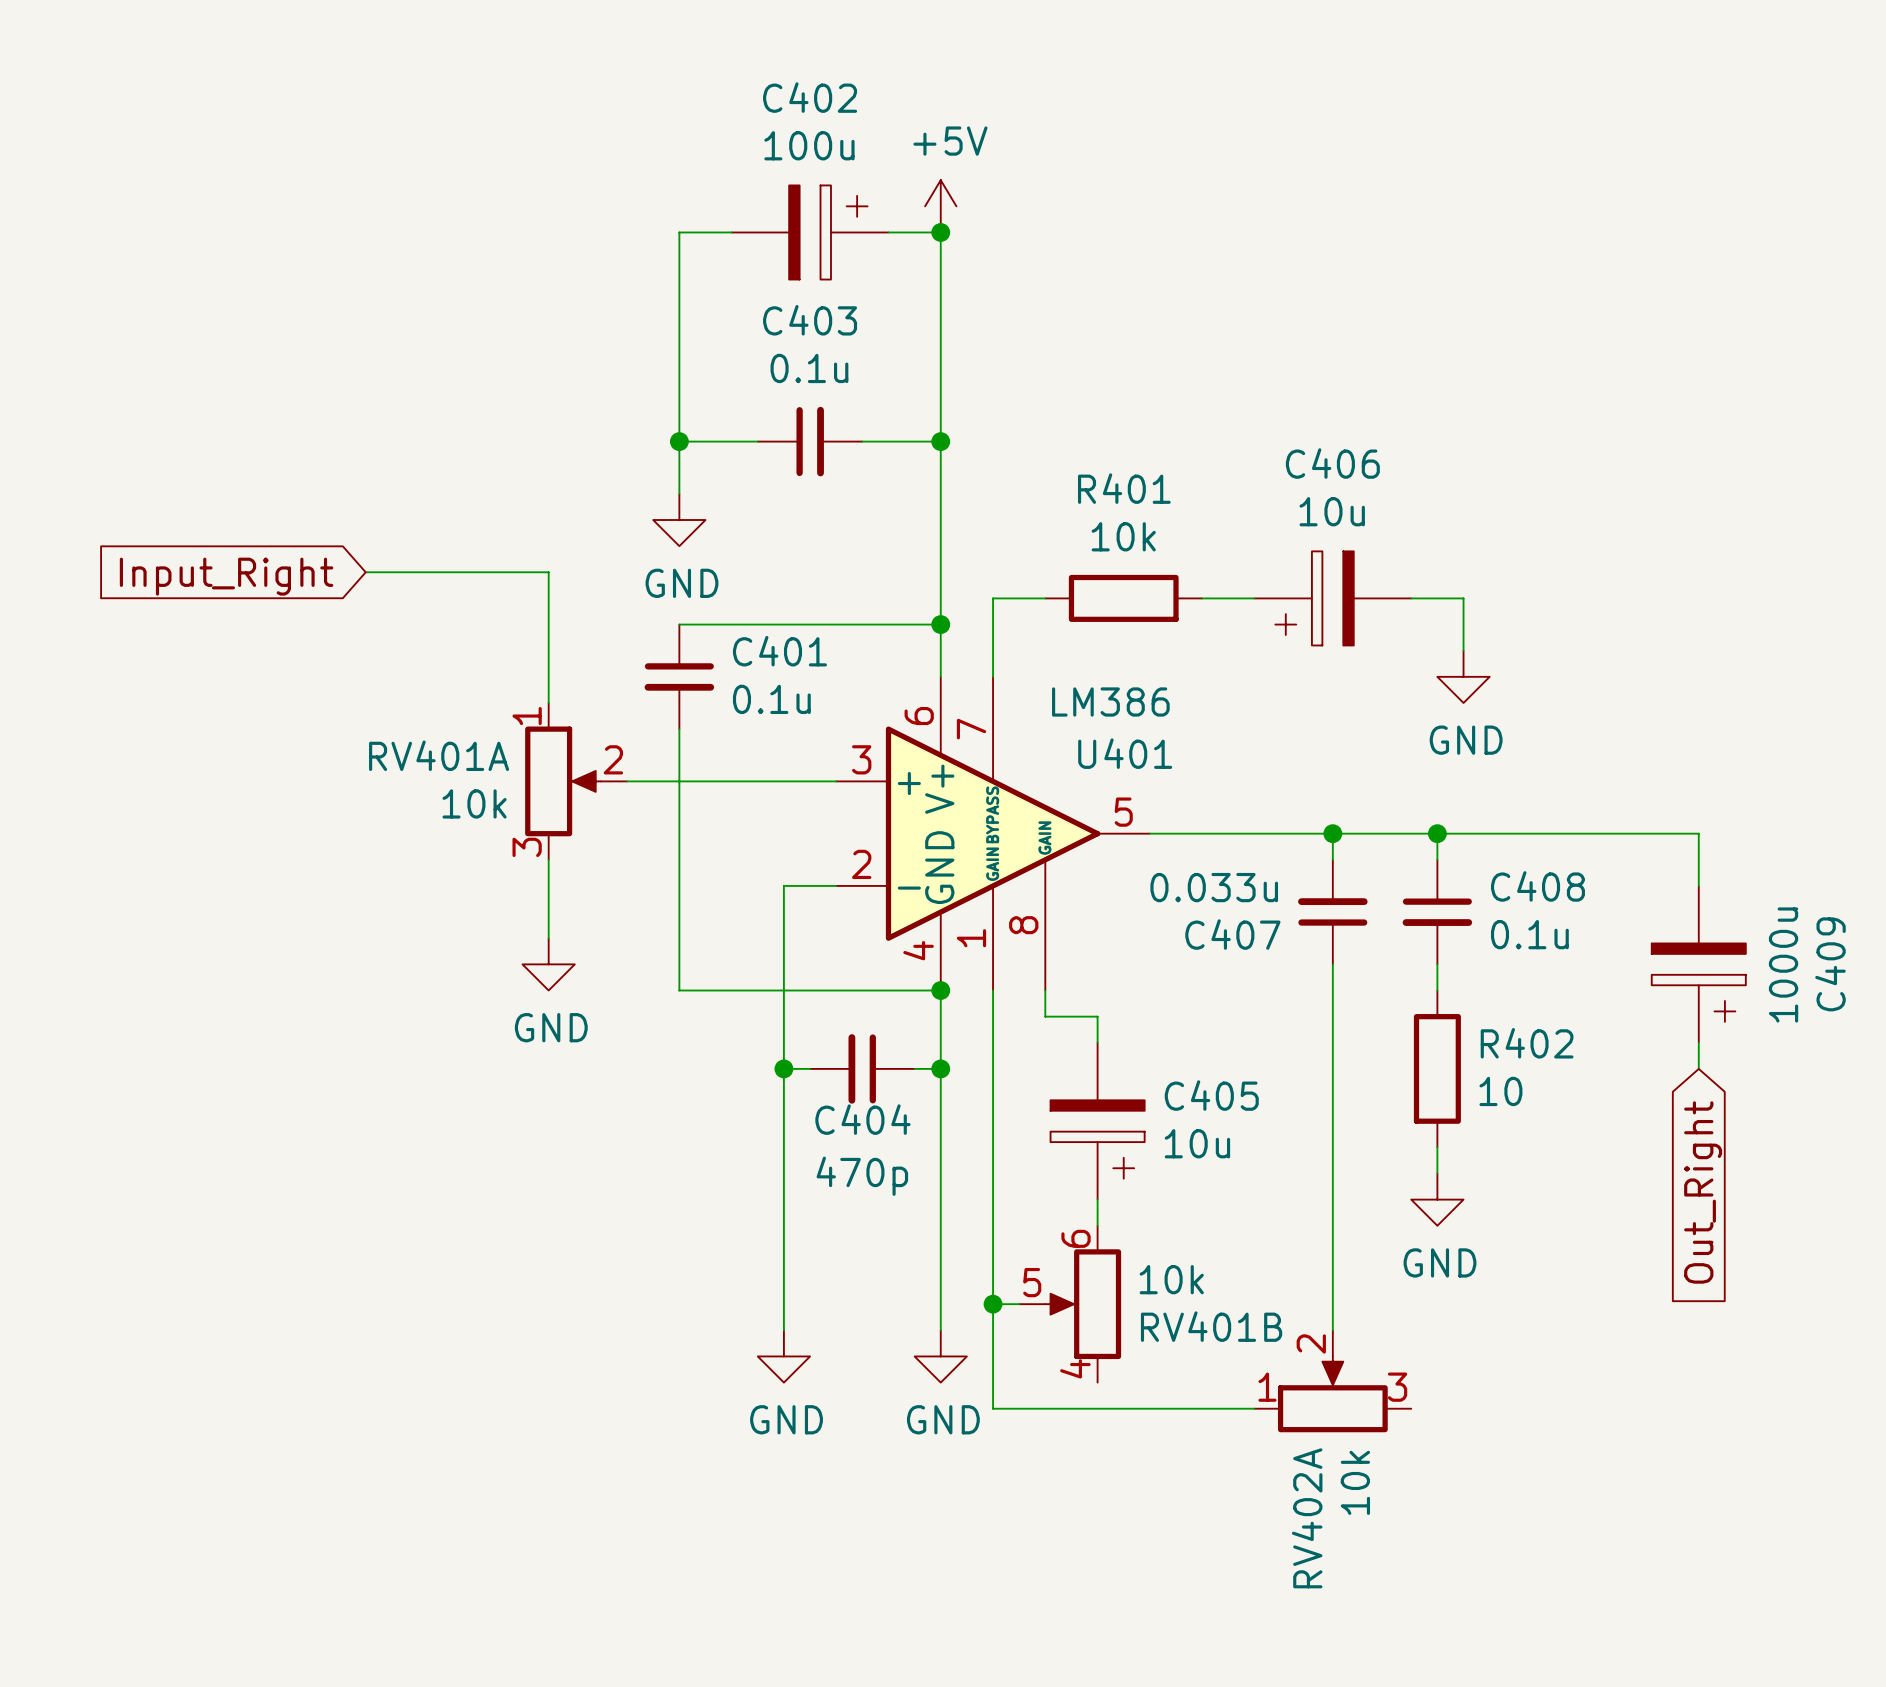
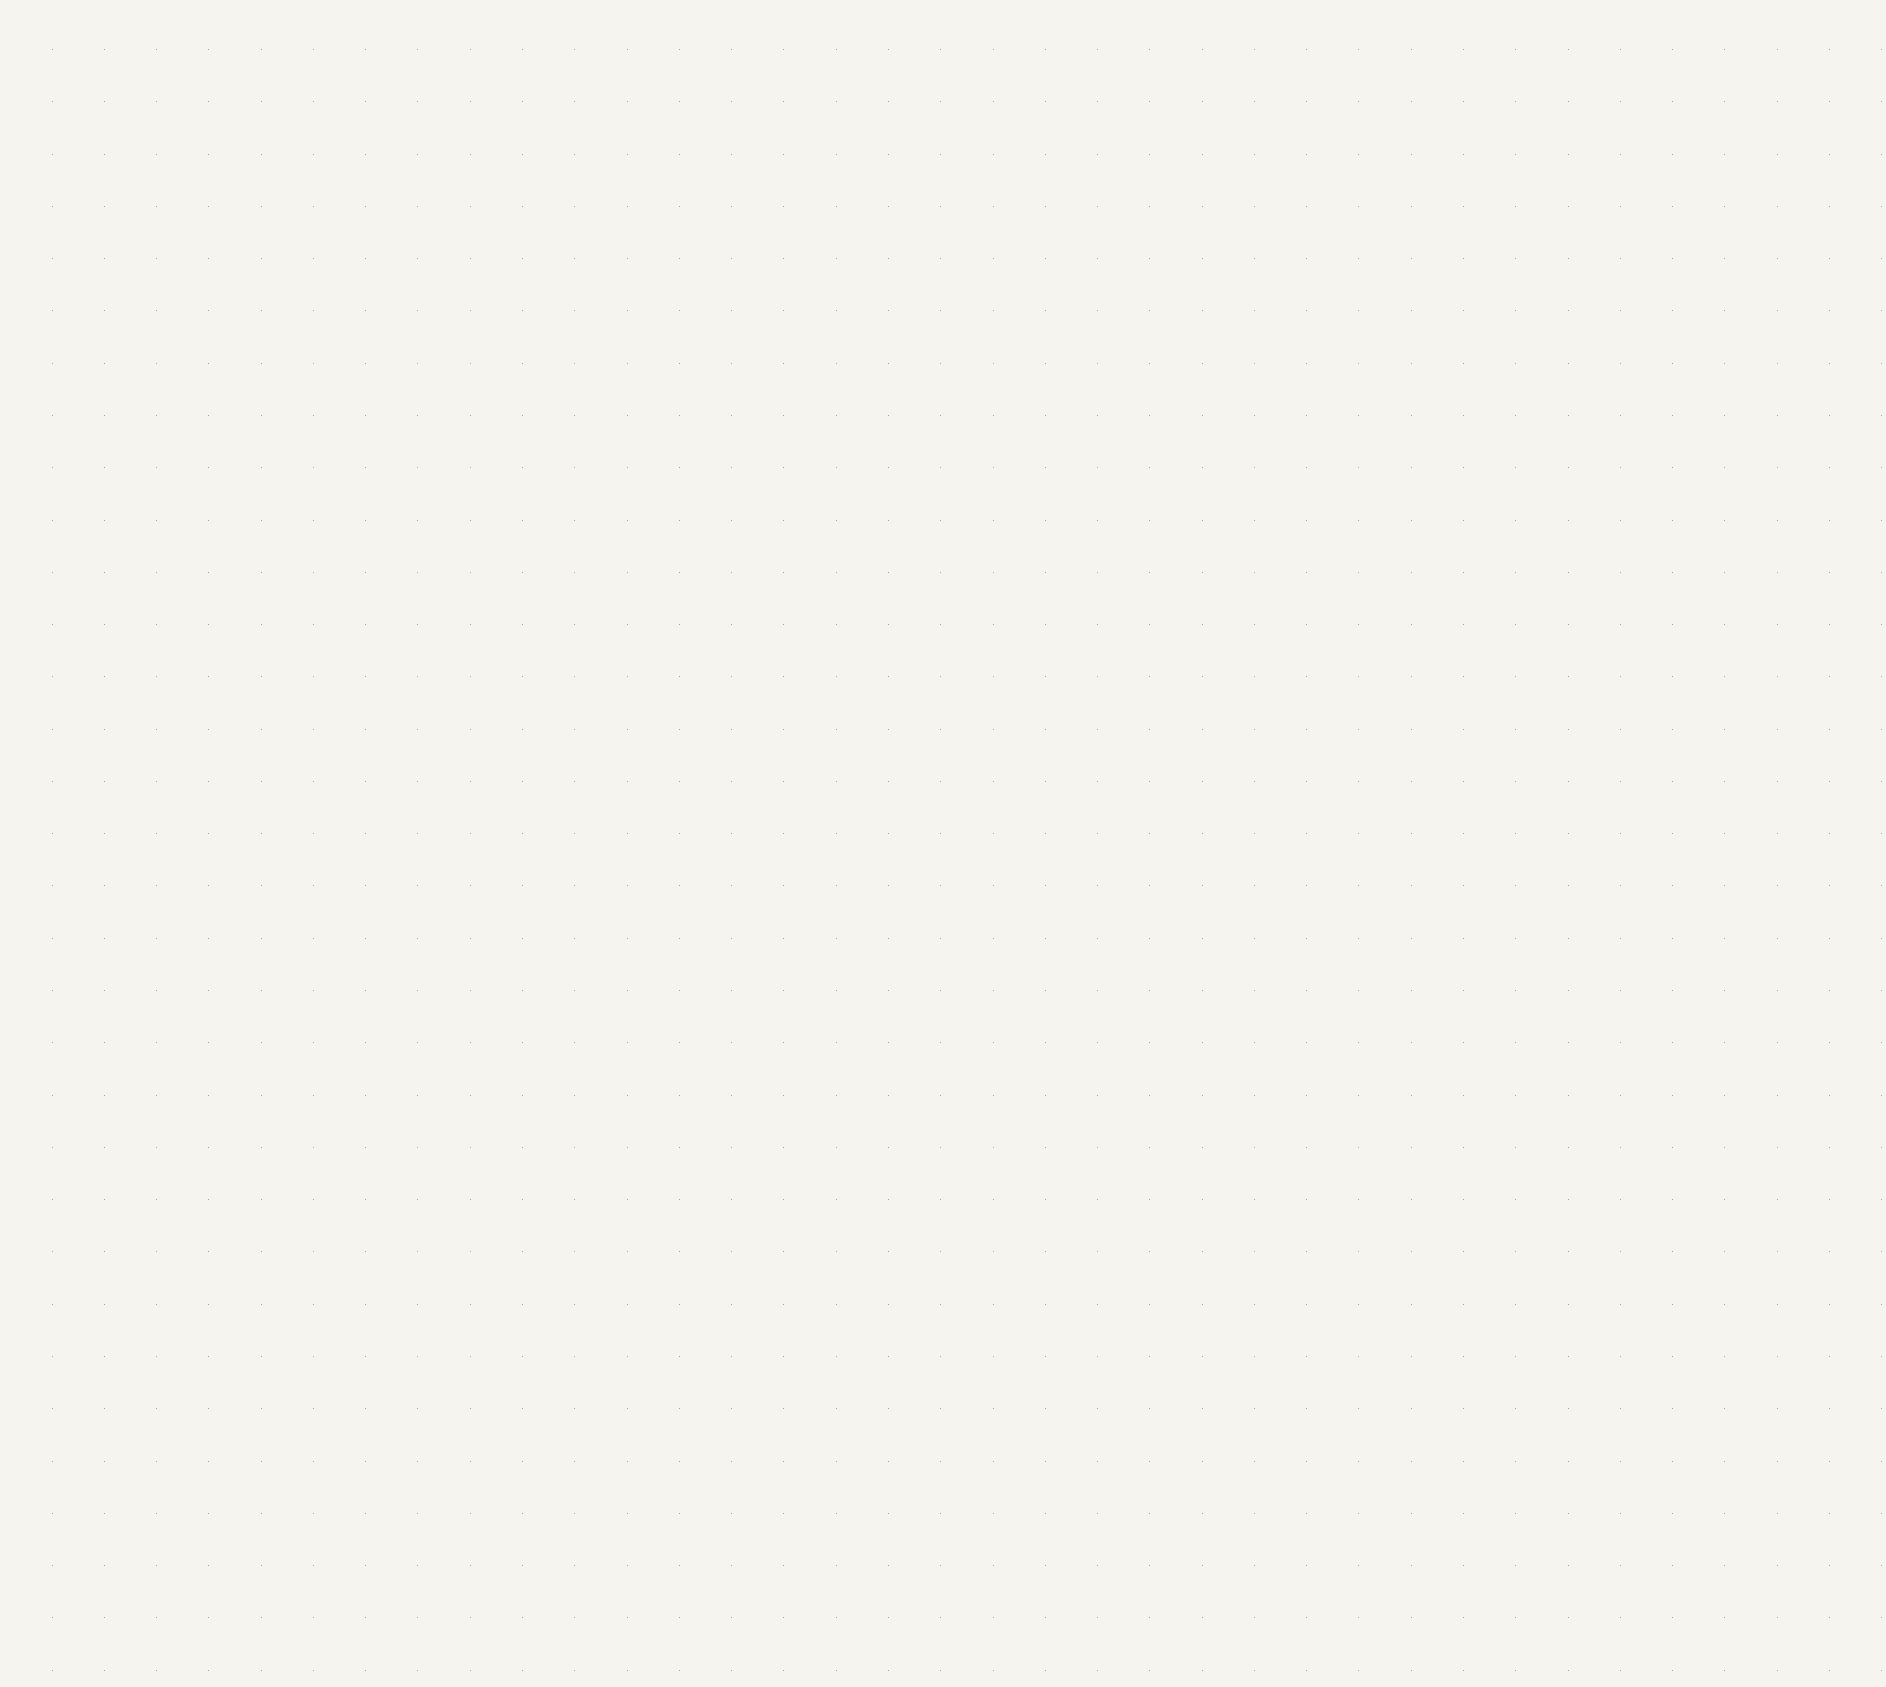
power symbol: +5V (940, 206) -> none
wire: (731, 232) (679, 232) (679, 493) -> none
C402: 100u (810, 232) -> none
wire: (888, 232) (940, 232) (940, 676) -> none
junction: (940, 232) -> none
wire: (679, 441) (757, 441) -> none
junction: (679, 441) -> none
C403: 0.1u (810, 441) -> none
wire: (862, 441) (940, 441) -> none
junction: (940, 441) -> none
power symbol: GND (679, 520) -> none
wire: (365, 572) (548, 572) (548, 702) -> none
global label: Input_Right (226, 576) -> none
wire: (1045, 598) (993, 598) (993, 676) -> none
R401: 10k (1123, 598) -> none
wire: (1202, 598) (1254, 598) -> none
C406: 10u (1332, 598) -> none
wire: (1411, 598) (1463, 598) (1463, 650) -> none
wire: (679, 624) (940, 624) -> none
junction: (940, 624) -> none
C401: 0.1u (679, 676) -> none
power symbol: GND (1463, 676) -> none
wire: (679, 729) (679, 990) (940, 990) (940, 1330) -> none
RV401A: 10k (576, 781) -> none
wire: (627, 781) (836, 781) -> none
U401: LM386 (993, 833) -> none
wire: (1149, 833) (1698, 833) (1698, 885) -> none
wire: (1332, 833) (1332, 859) -> none
junction: (1332, 833) -> none
wire: (1437, 833) (1437, 859) -> none
junction: (1437, 833) -> none
wire: (548, 859) (548, 938) -> none
wire: (836, 885) (783, 885) (783, 1330) -> none
C407: 0.033u (1332, 912) -> none
C408: 0.1u (1437, 912) -> none
power symbol: GND (548, 964) -> none
wire: (1332, 964) (1332, 1330) -> none
wire: (1437, 964) (1437, 990) -> none
C409: 1000u (1698, 964) -> none
junction: (940, 990) -> none
wire: (993, 990) (993, 1408) (1254, 1408) -> none
wire: (1045, 990) (1045, 1016) (1097, 1016) (1097, 1042) -> none
wire: (1698, 1042) (1698, 1068) -> none
wire: (783, 1068) (810, 1068) -> none
junction: (783, 1068) -> none
C404: 470p (862, 1068) -> none
wire: (914, 1068) (940, 1068) -> none
junction: (940, 1068) -> none
R402: 10 (1437, 1068) -> none
C405: 10u (1097, 1121) -> none
wire: (1437, 1147) (1437, 1173) -> none
global label: Out_Right (1703, 1192) -> none
wire: (1097, 1199) (1097, 1225) -> none
power symbol: GND (1437, 1199) -> none
wire: (993, 1304) (1019, 1304) -> none
junction: (993, 1304) -> none
RV401B: 10k (1070, 1304) -> none
power symbol: GND (783, 1356) -> none
power symbol: GND (940, 1356) -> none
RV402A: 10k (1332, 1381) -> none

